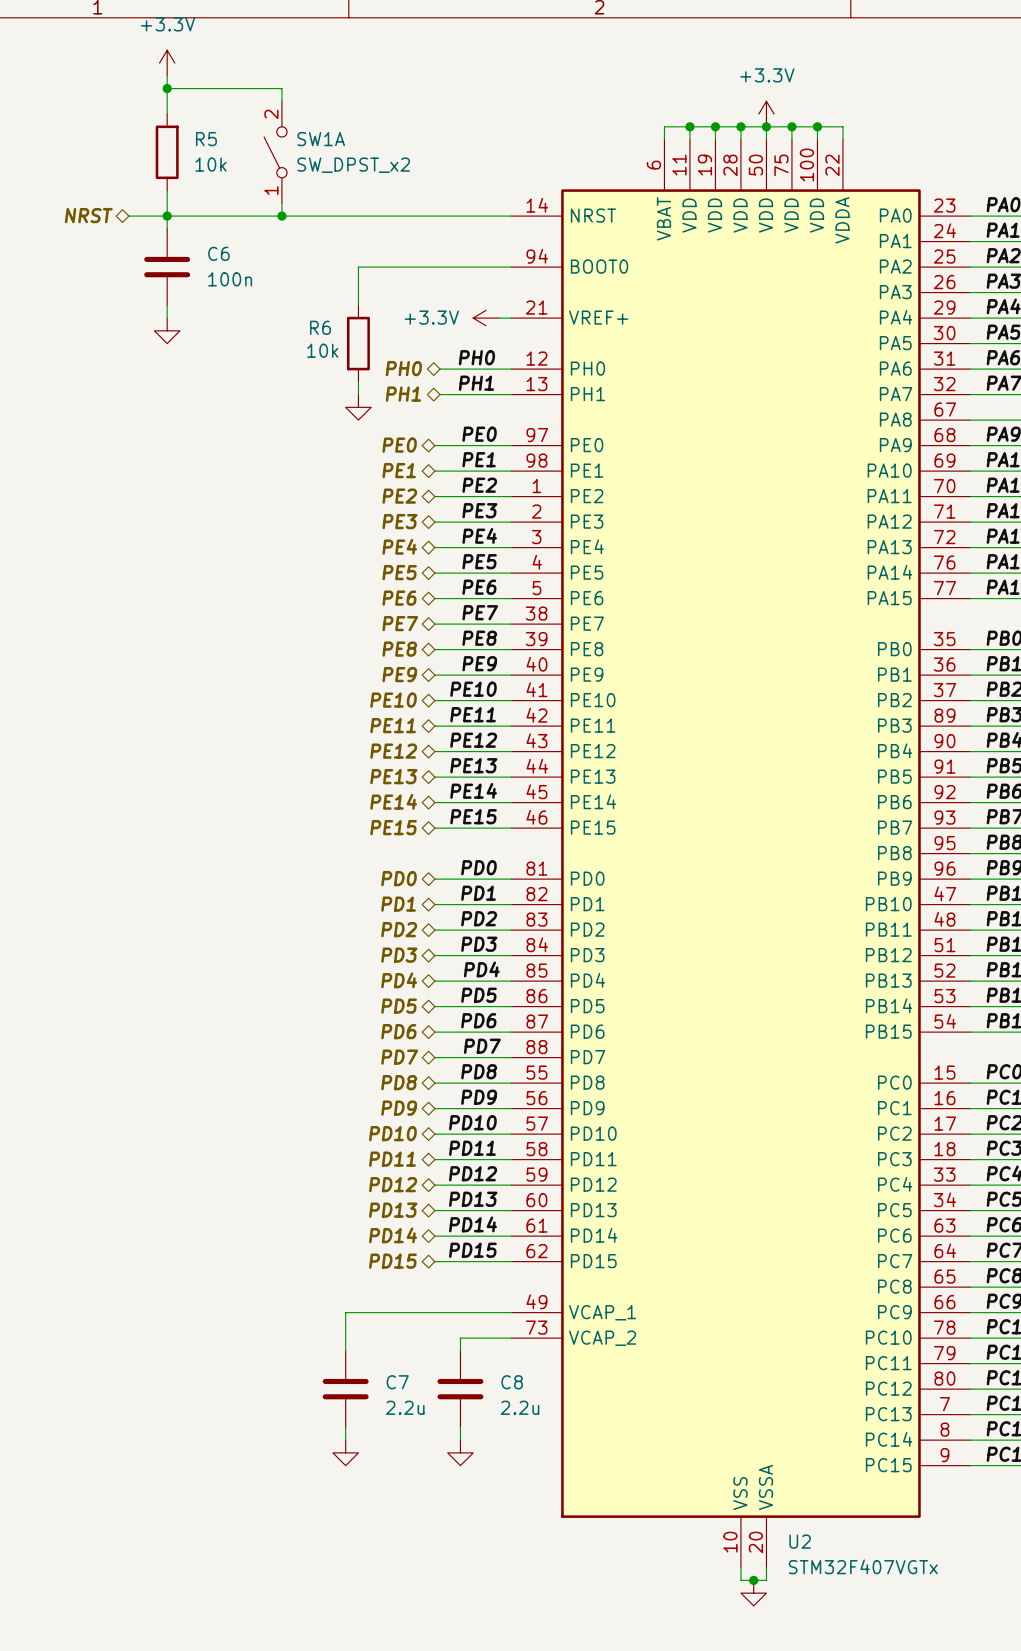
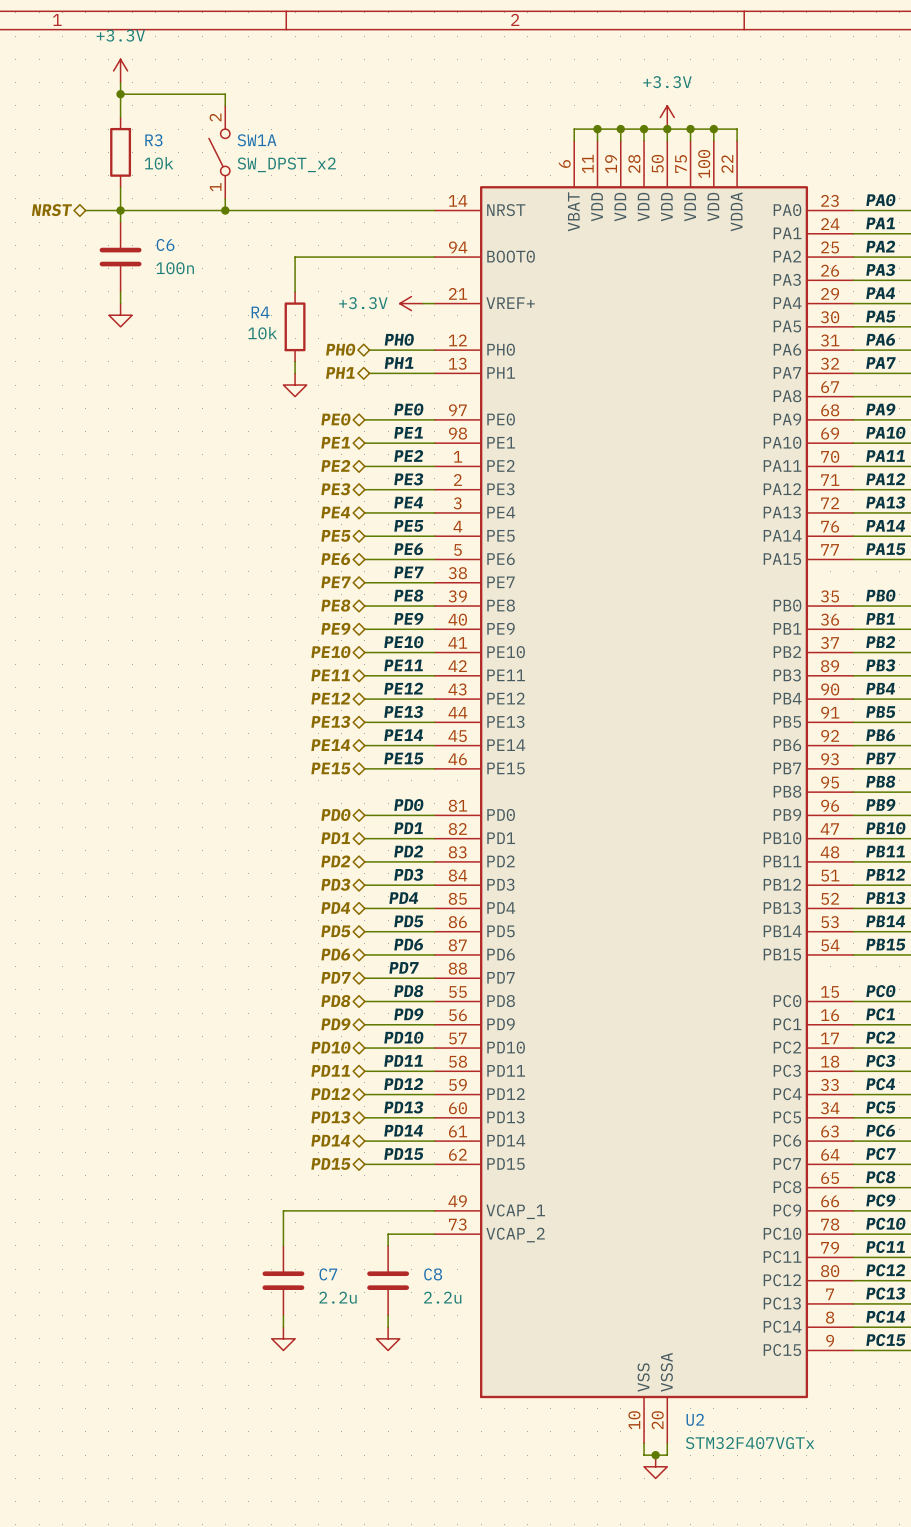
R5 name: R5 (206, 139) -> R3 (153, 140)
R6 name: R6 (320, 327) -> R4 (260, 312)

